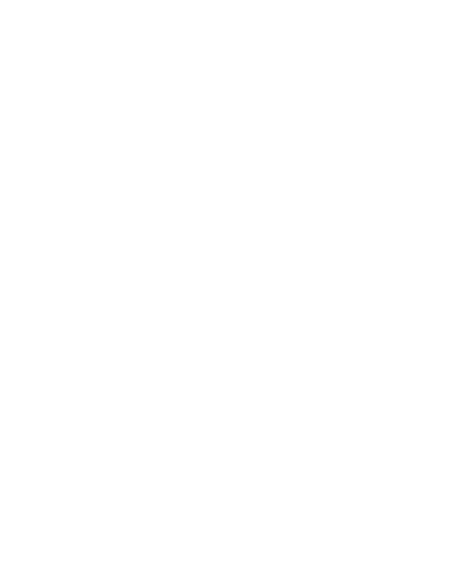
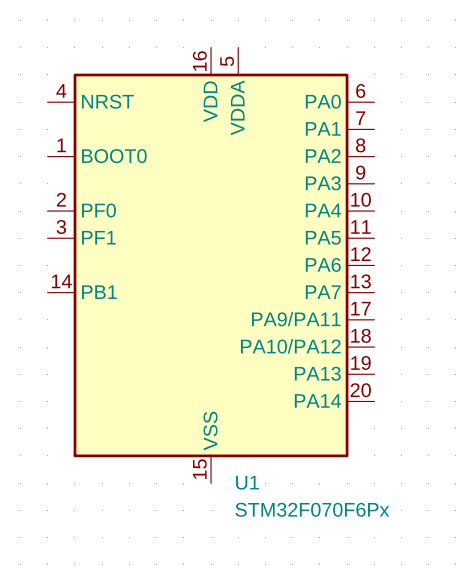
U1: none -> STM32F070F6Px (211, 265)

